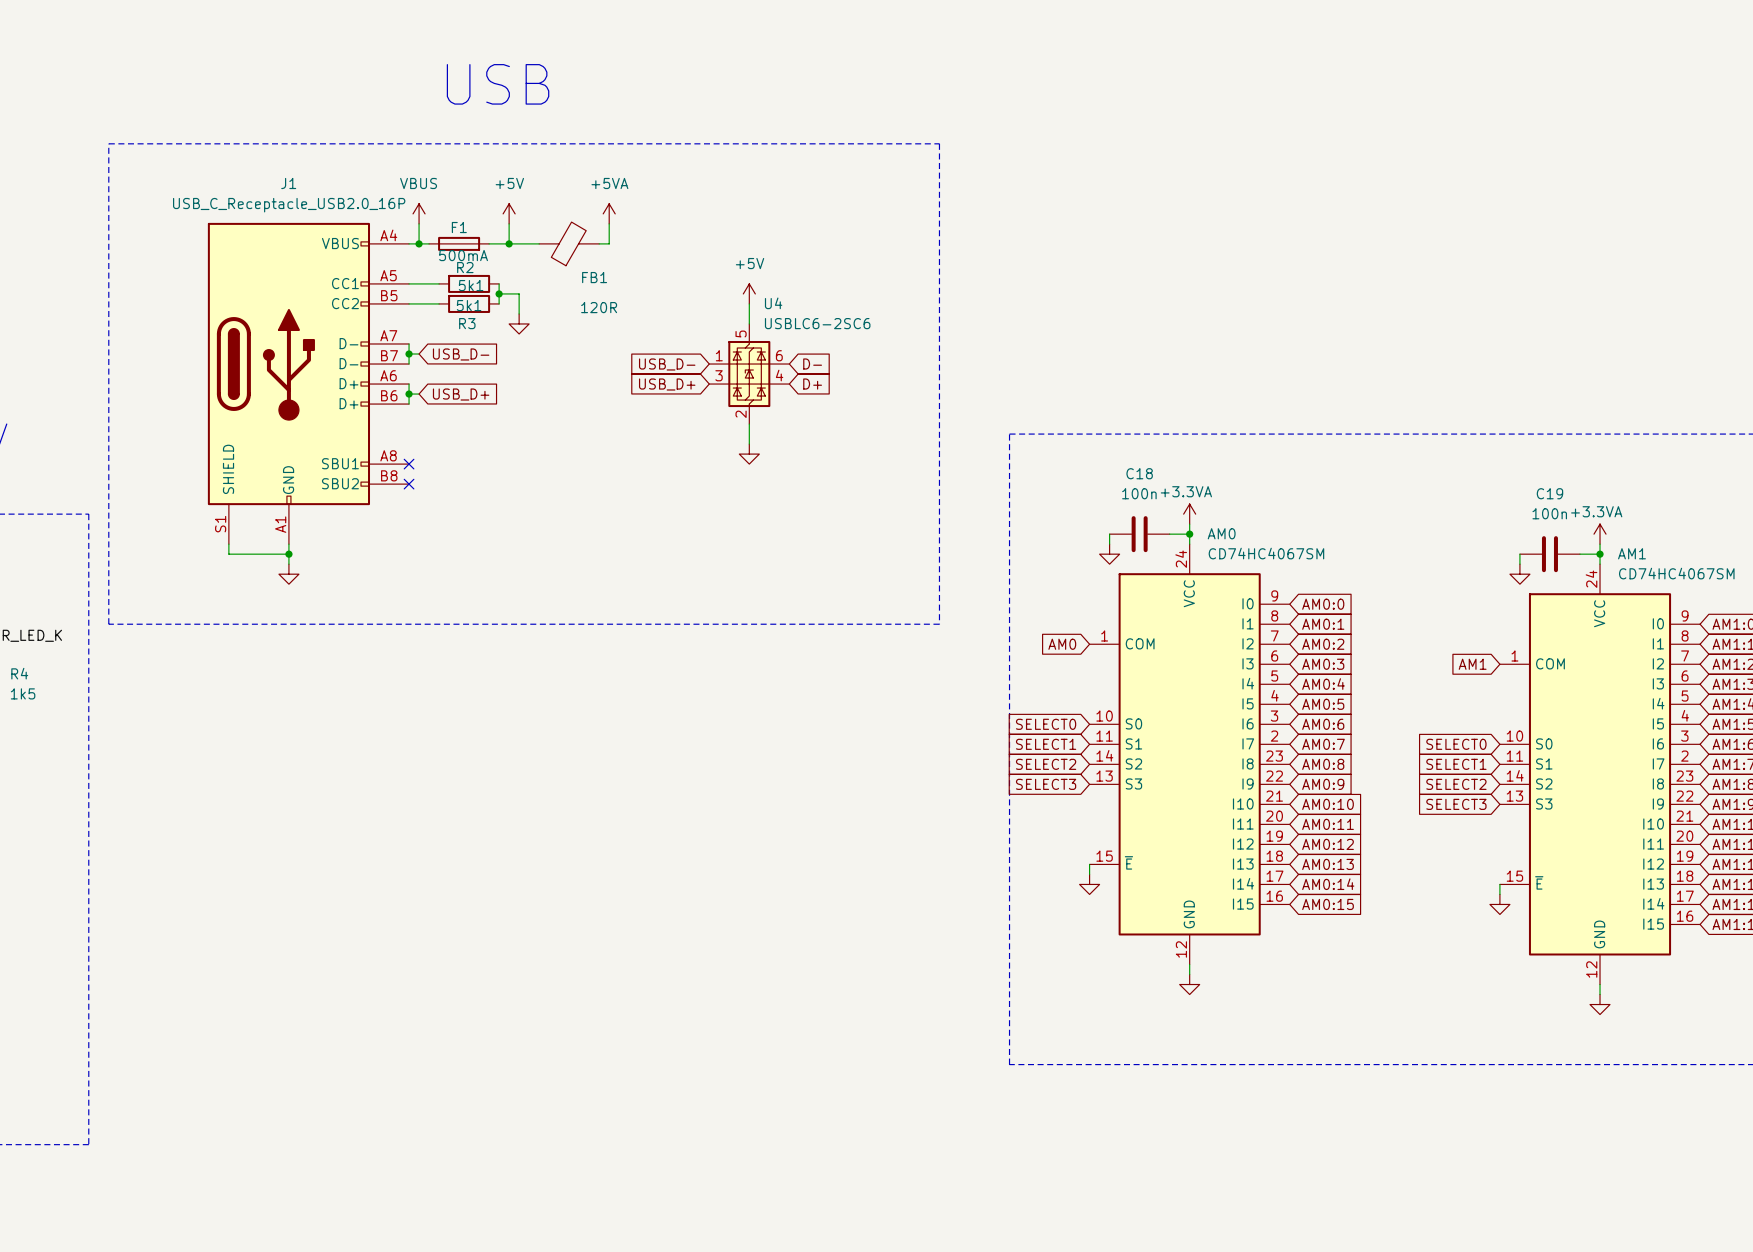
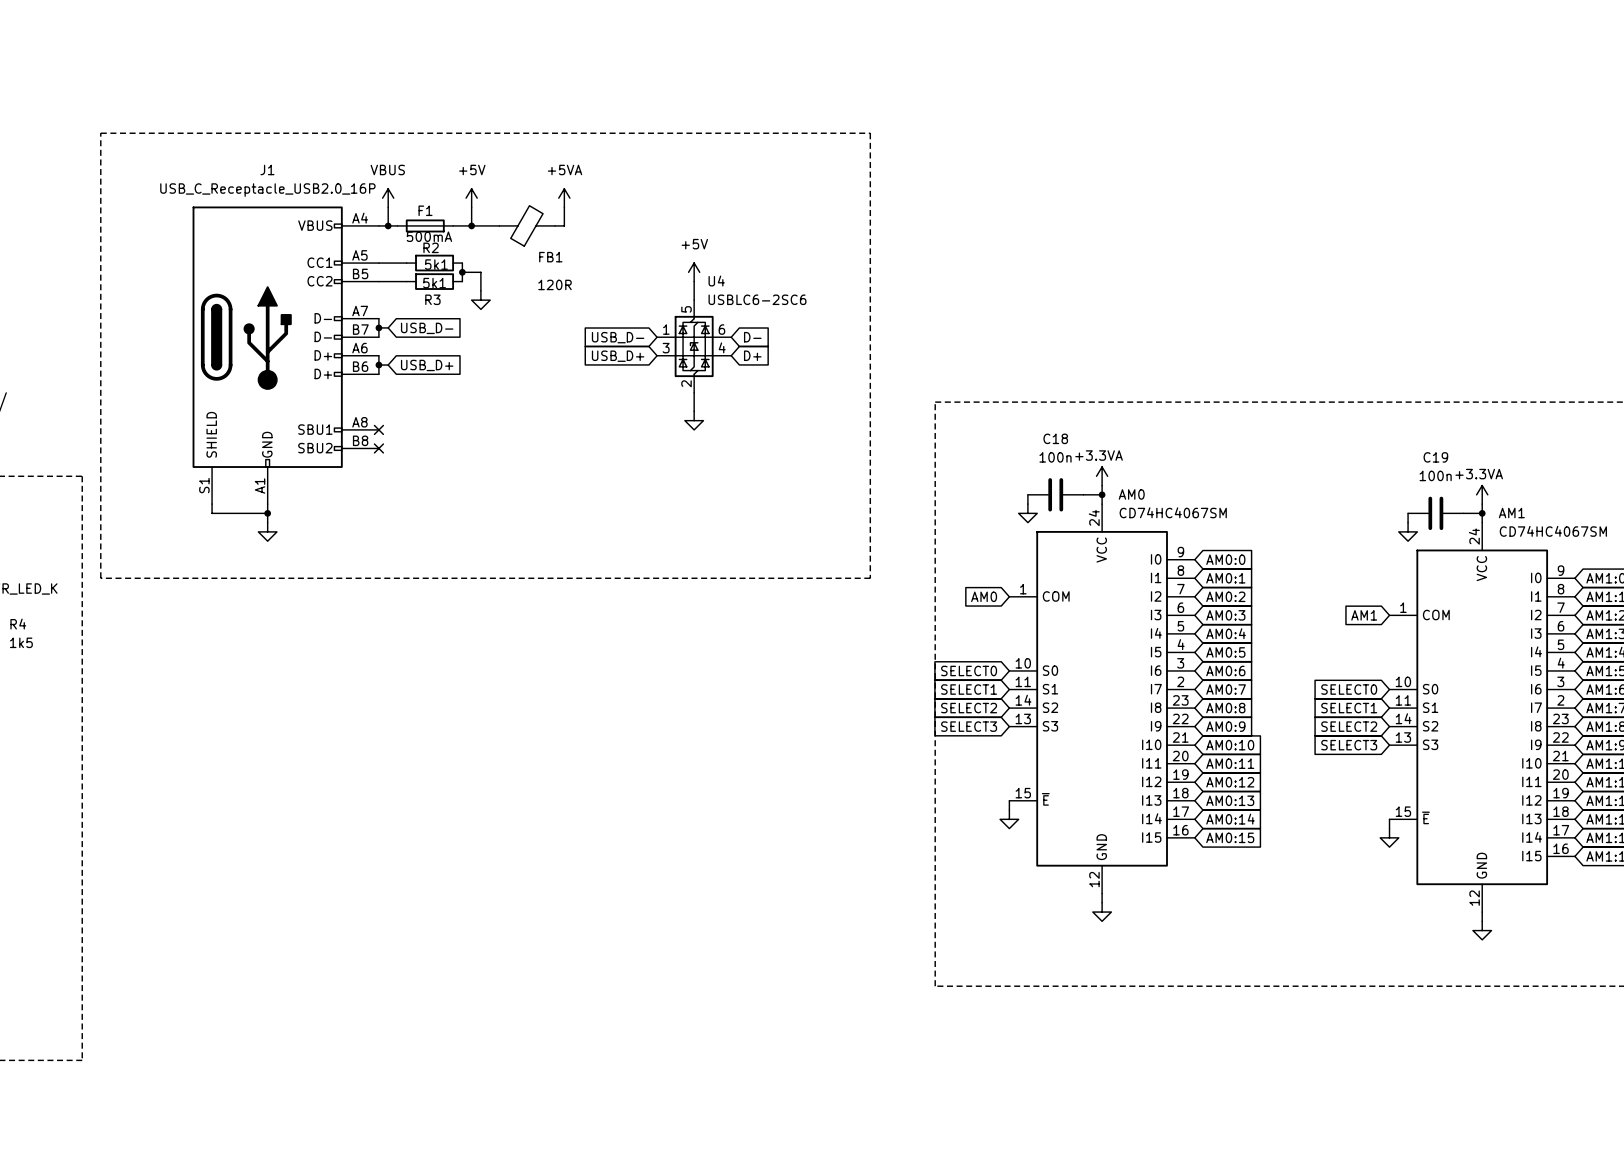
text: USB (498, 84) -> none

